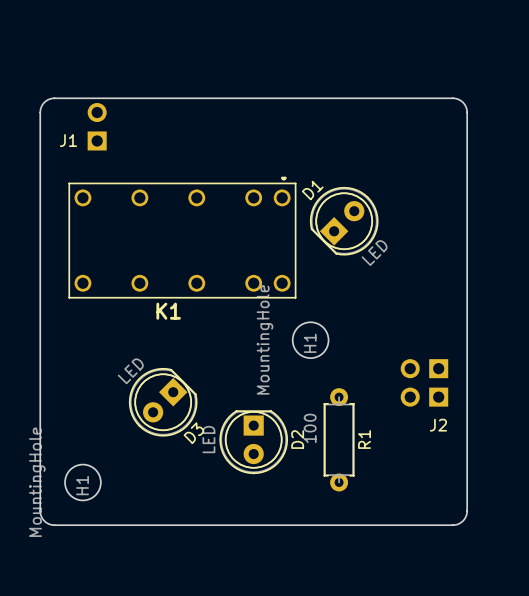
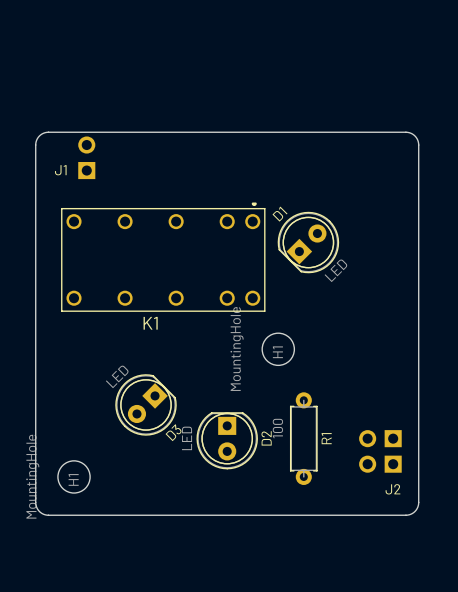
J2 position: (424, 368) -> (380, 438)
part position: (424, 397) -> (380, 464)

